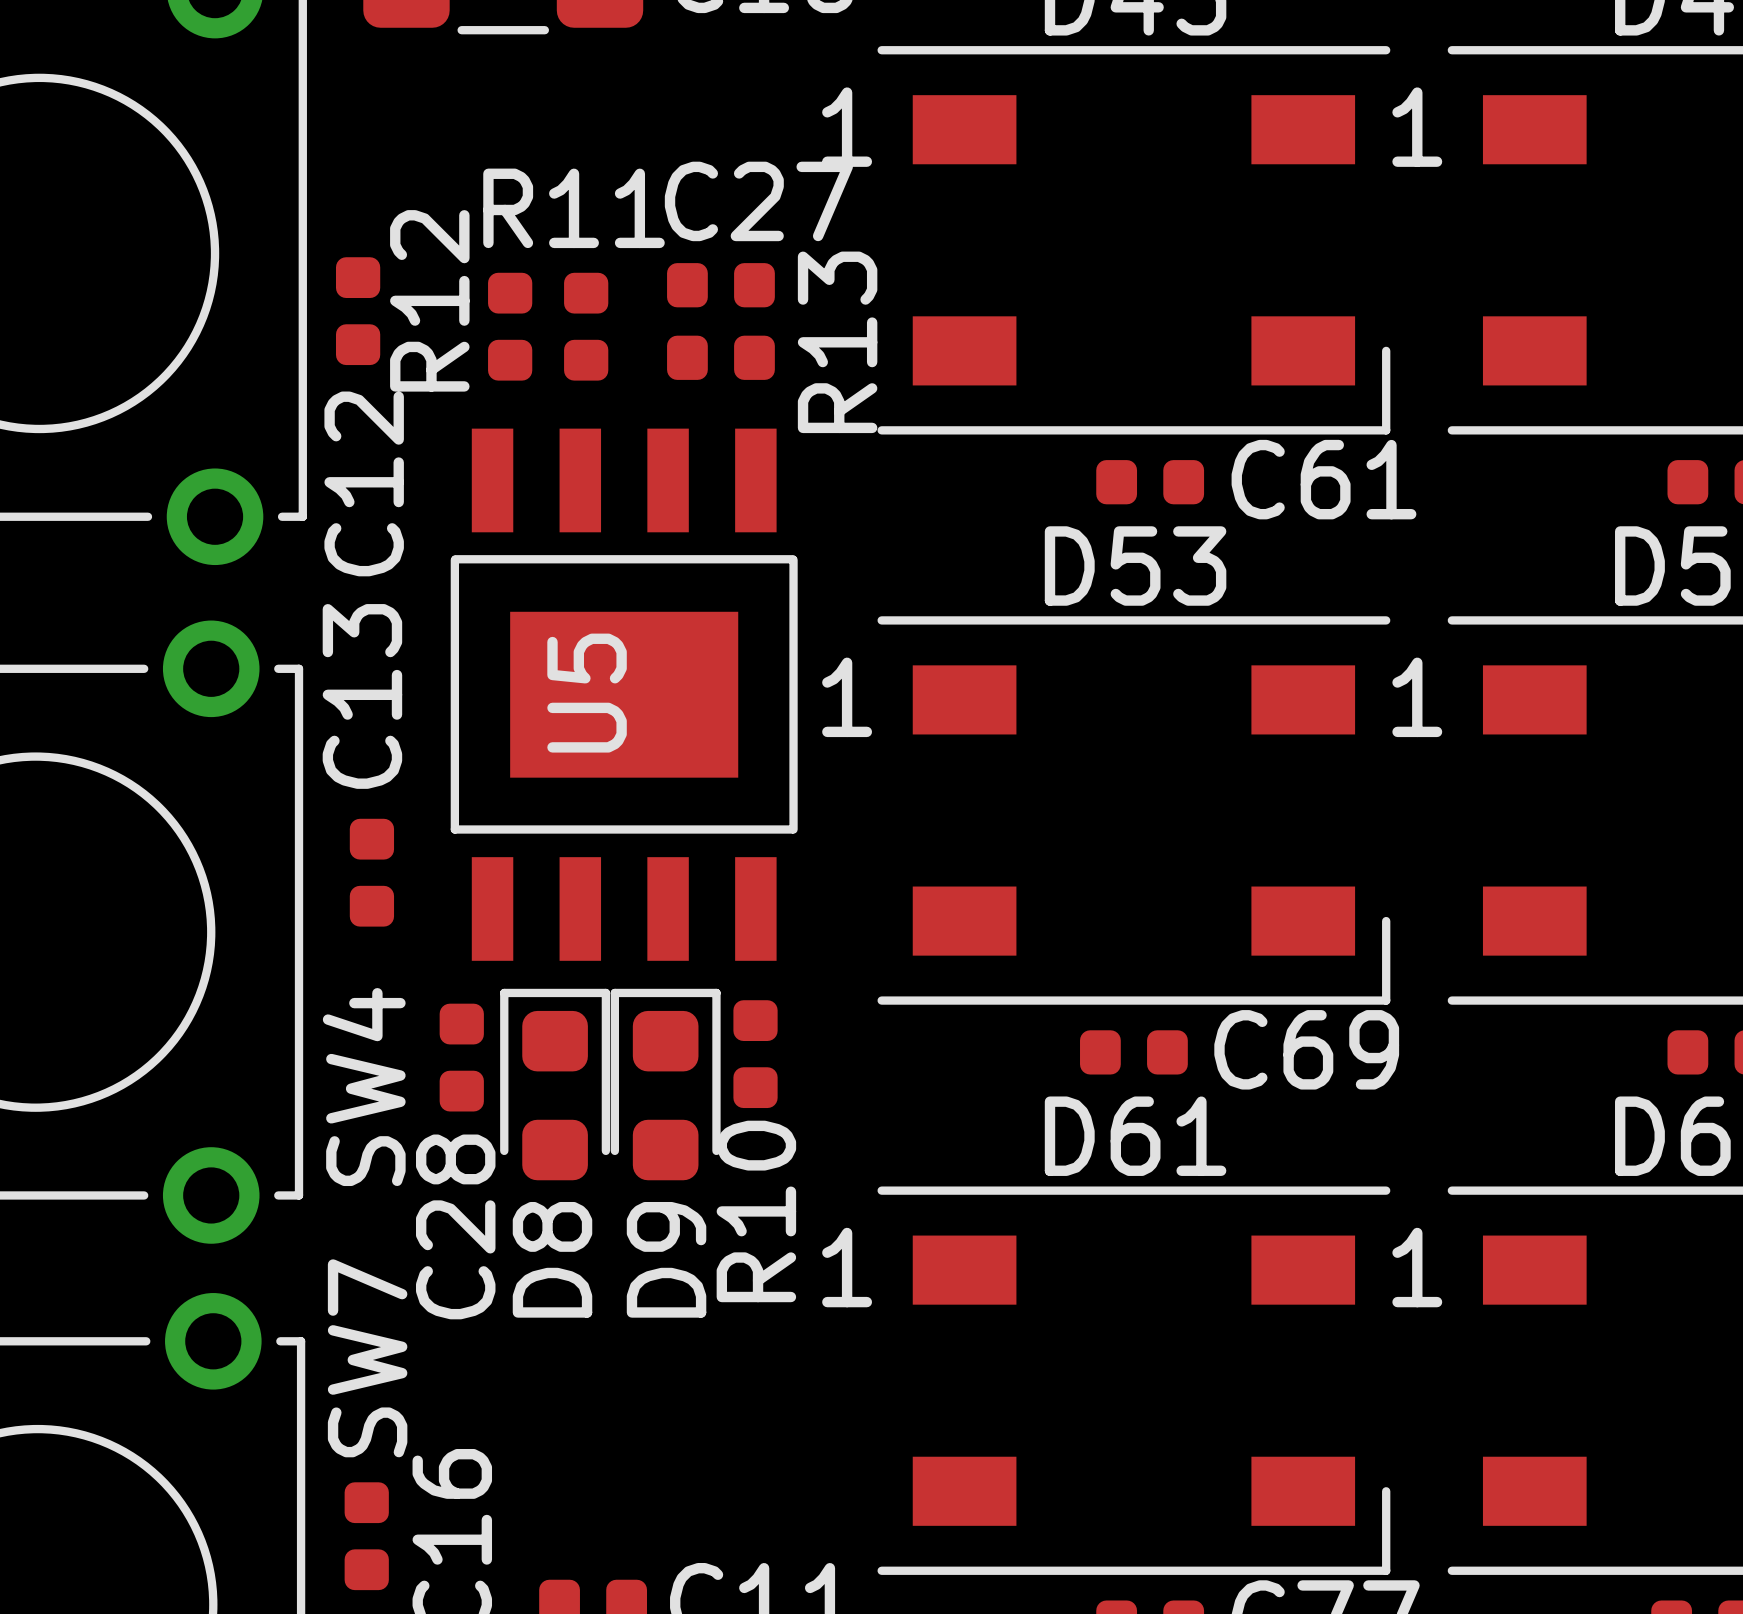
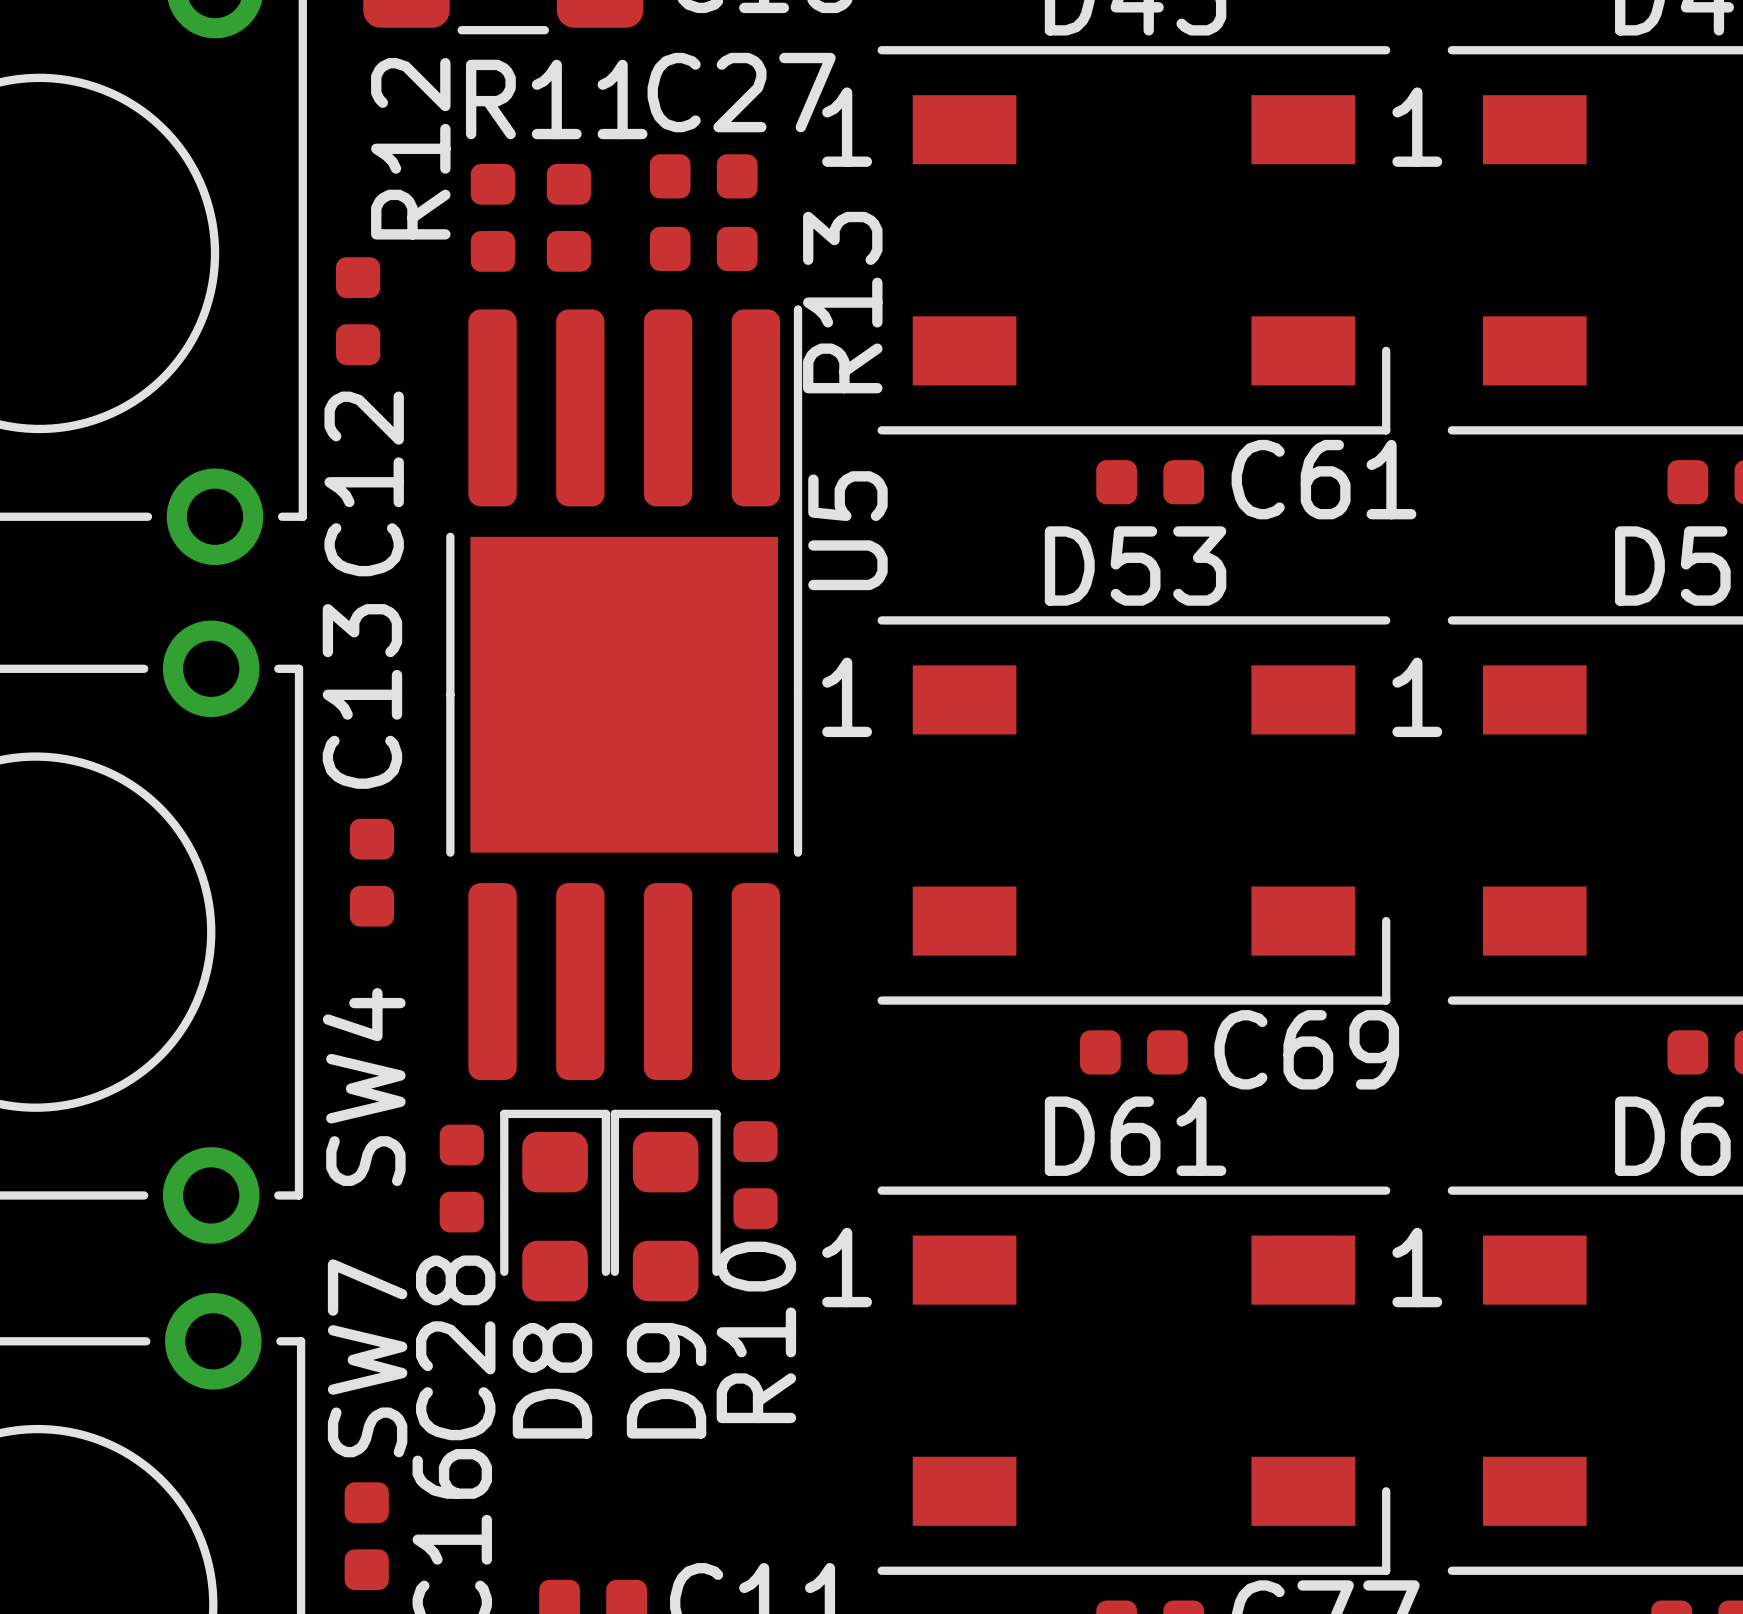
C27 position: (720, 285) -> (703, 176)
R12 name position: R12 (429, 300) -> R12 (410, 148)
R12 position: (510, 326) -> (492, 217)
R11 position: (586, 326) -> (568, 217)
R13 name position: R13 (837, 342) -> R13 (842, 302)
R13 position: (720, 357) -> (703, 248)
U5 footprint: [450, 428, 798, 961] -> [446, 305, 803, 1081]
U5 name position: U5 (587, 693) -> U5 (847, 530)
R10 position: (755, 1054) -> (755, 1175)
C28 position: (461, 1057) -> (461, 1178)
D8 position: (555, 1084) -> (555, 1205)
D9 position: (665, 1084) -> (665, 1205)

